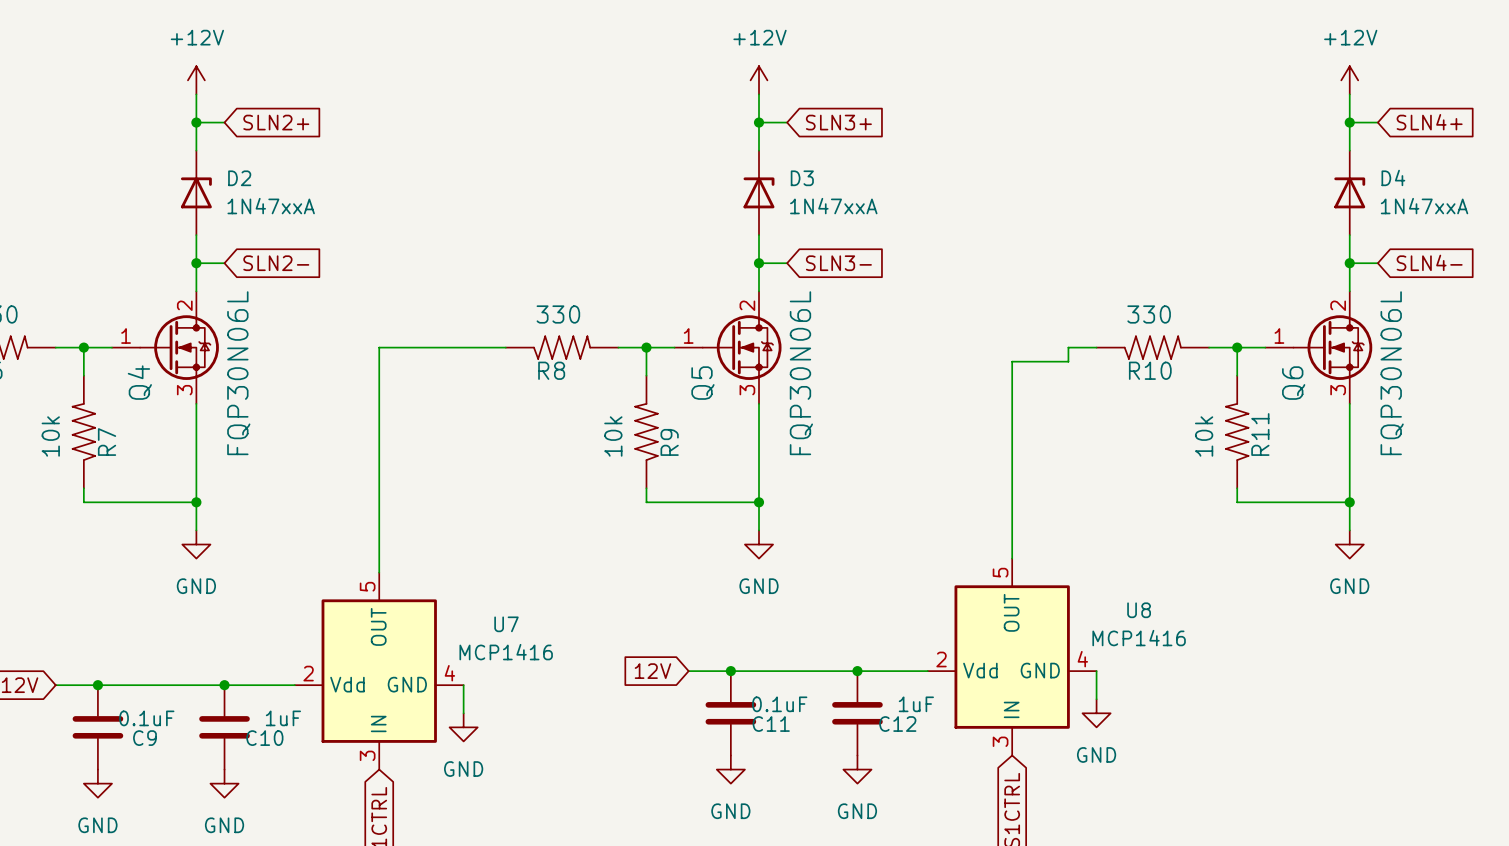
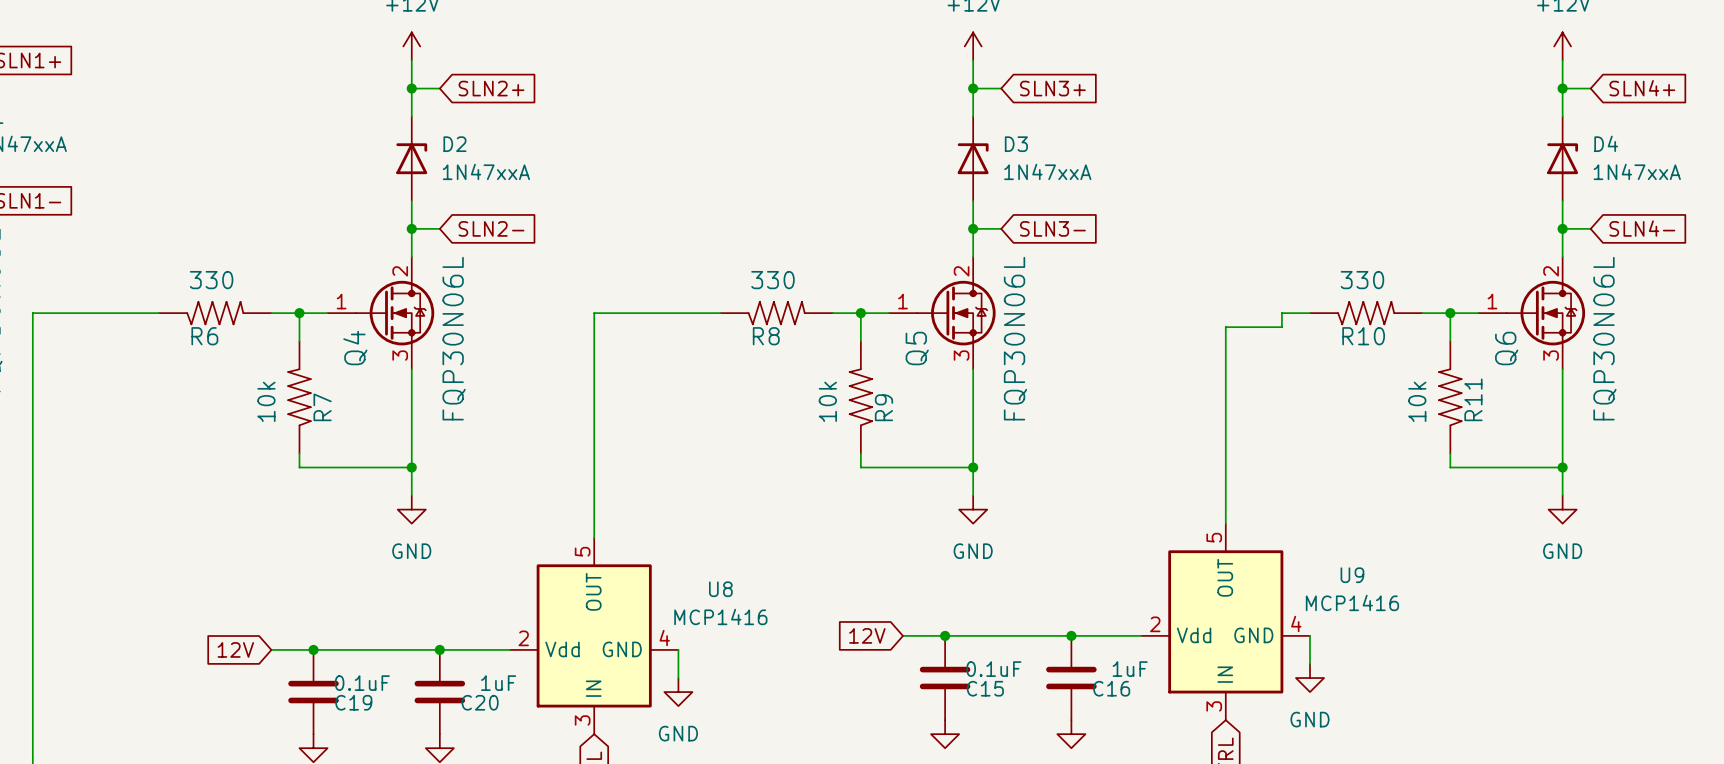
U8 name: U8 (1139, 610) -> U9 (1352, 575)
U7 name: U7 (506, 624) -> U8 (720, 589)
C11 name: C11 (771, 724) -> C15 (985, 688)
C12 name: C12 (897, 724) -> C16 (1111, 688)
C9 name: C9 (144, 738) -> C19 (353, 702)
C10 name: C10 (264, 738) -> C20 (480, 702)

